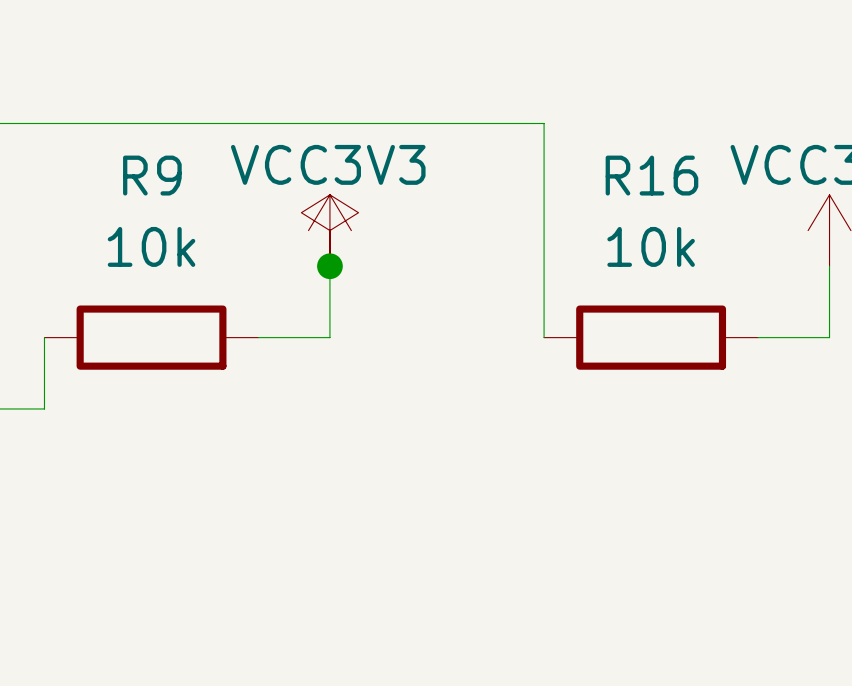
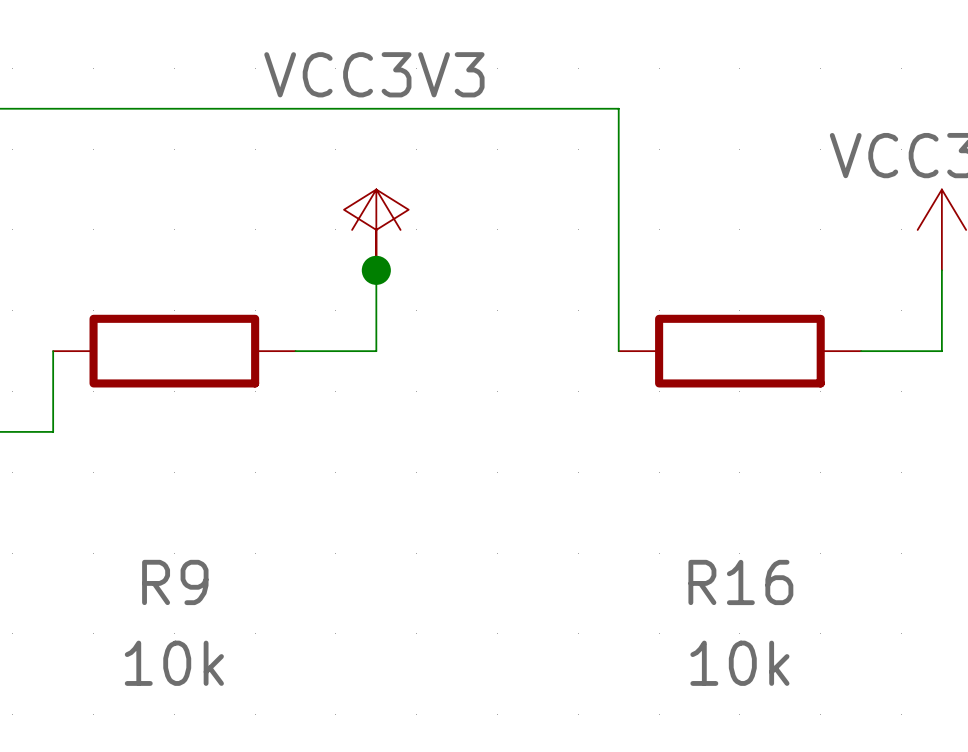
power symbol text position: VCC3V3 (328, 164) -> VCC3V3 (374, 74)
R9 name position: R9 (152, 175) -> R9 (175, 582)
R16 name position: R16 (651, 175) -> R16 (740, 582)
R9 value position: 10k (151, 246) -> 10k (174, 663)
R16 value position: 10k (651, 246) -> 10k (739, 663)

